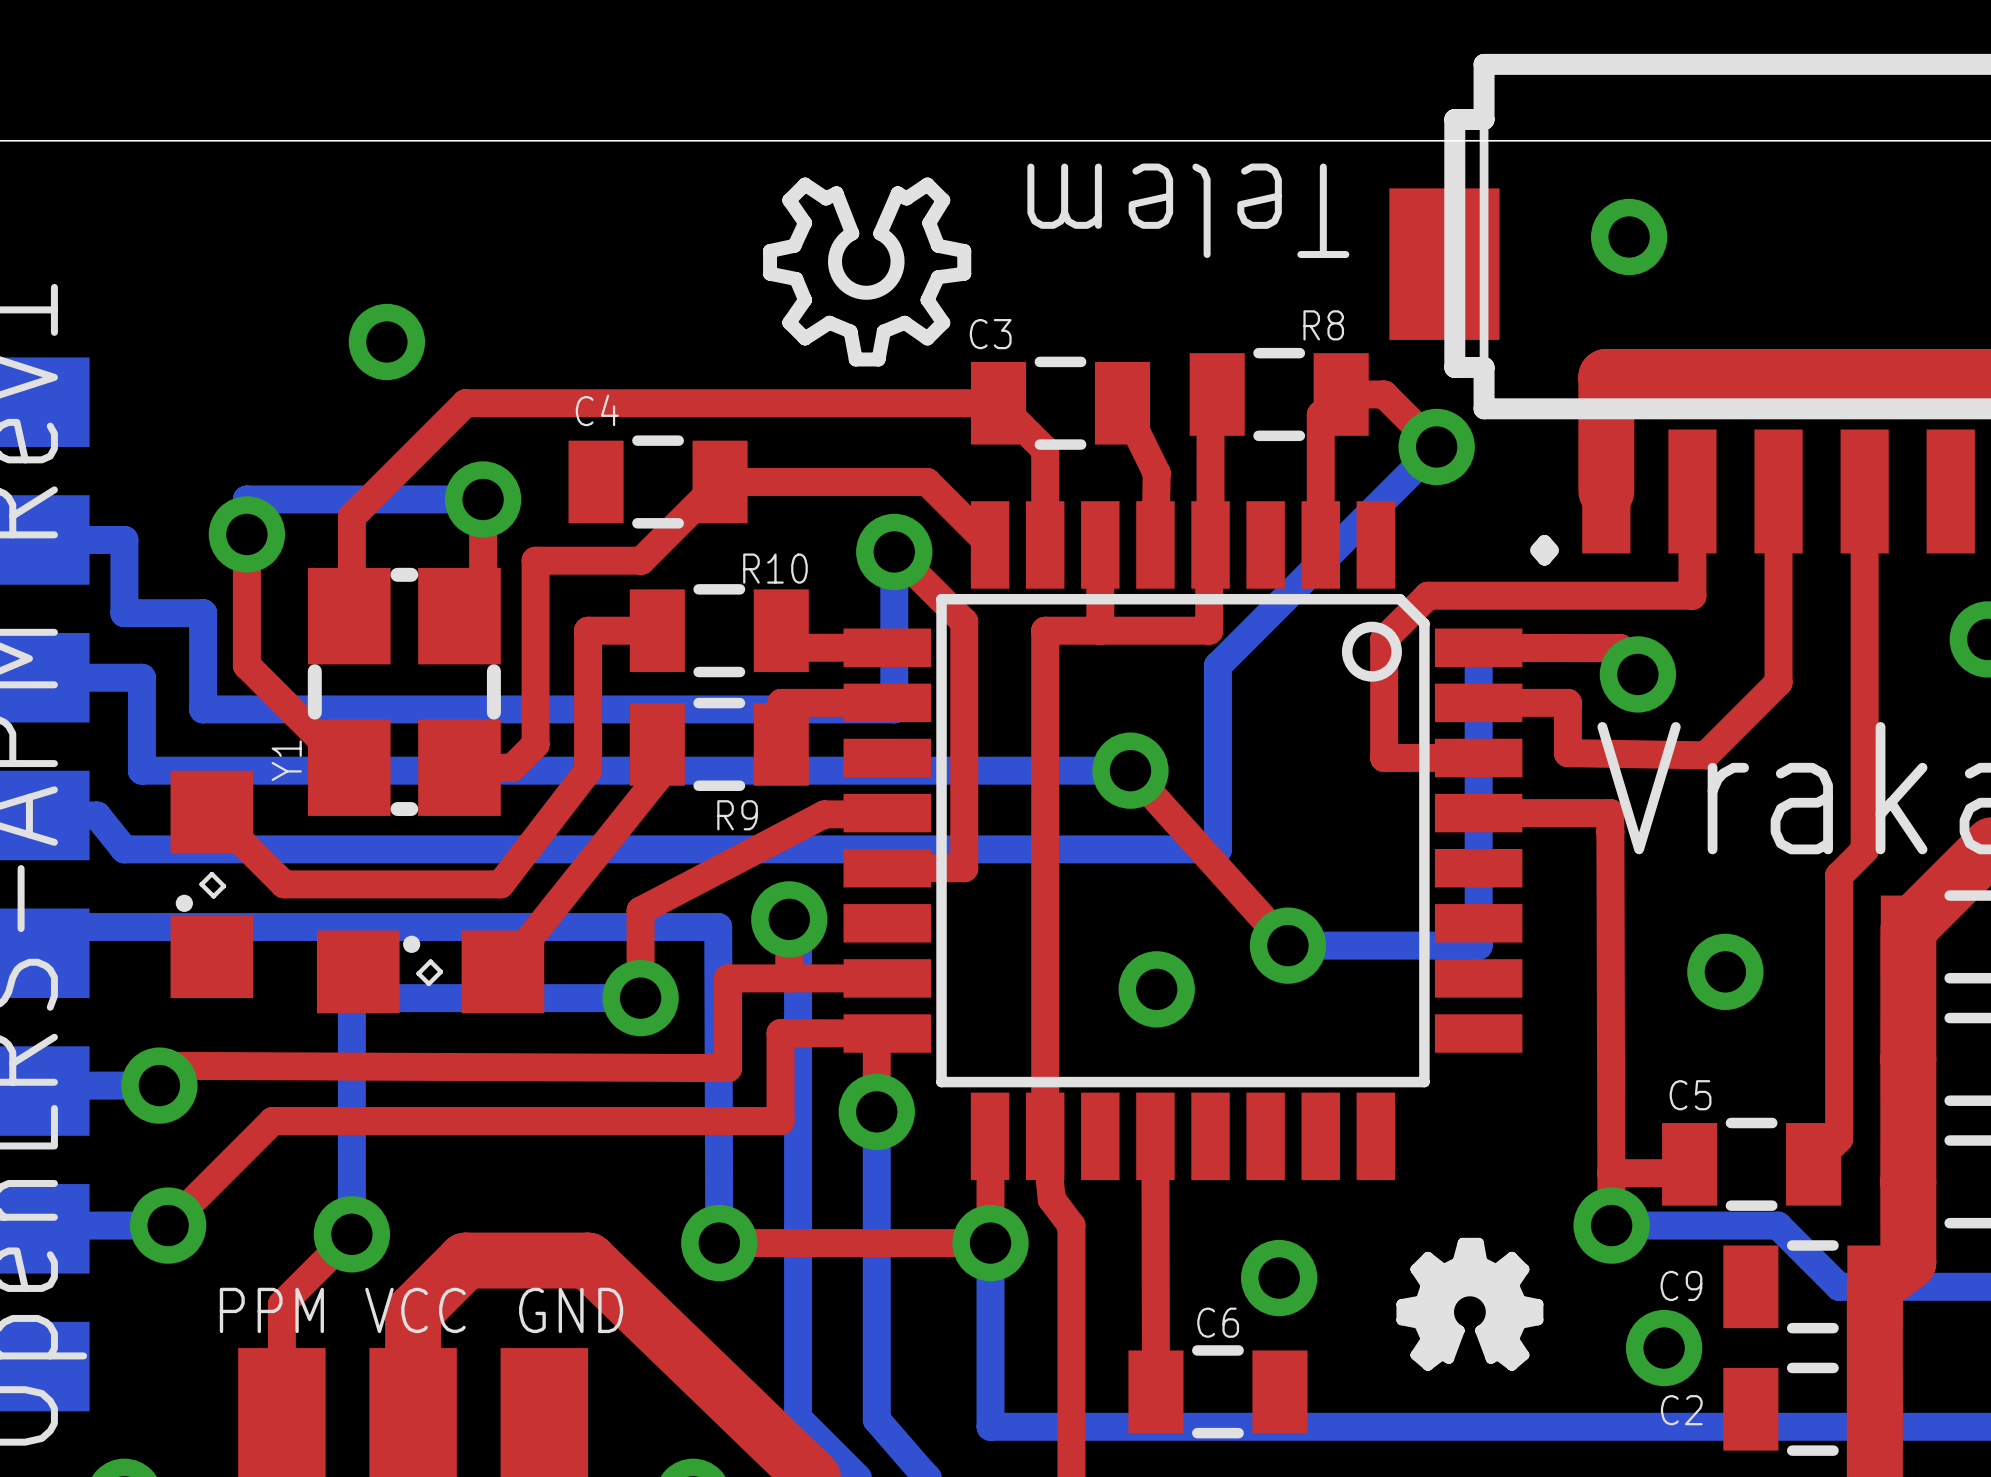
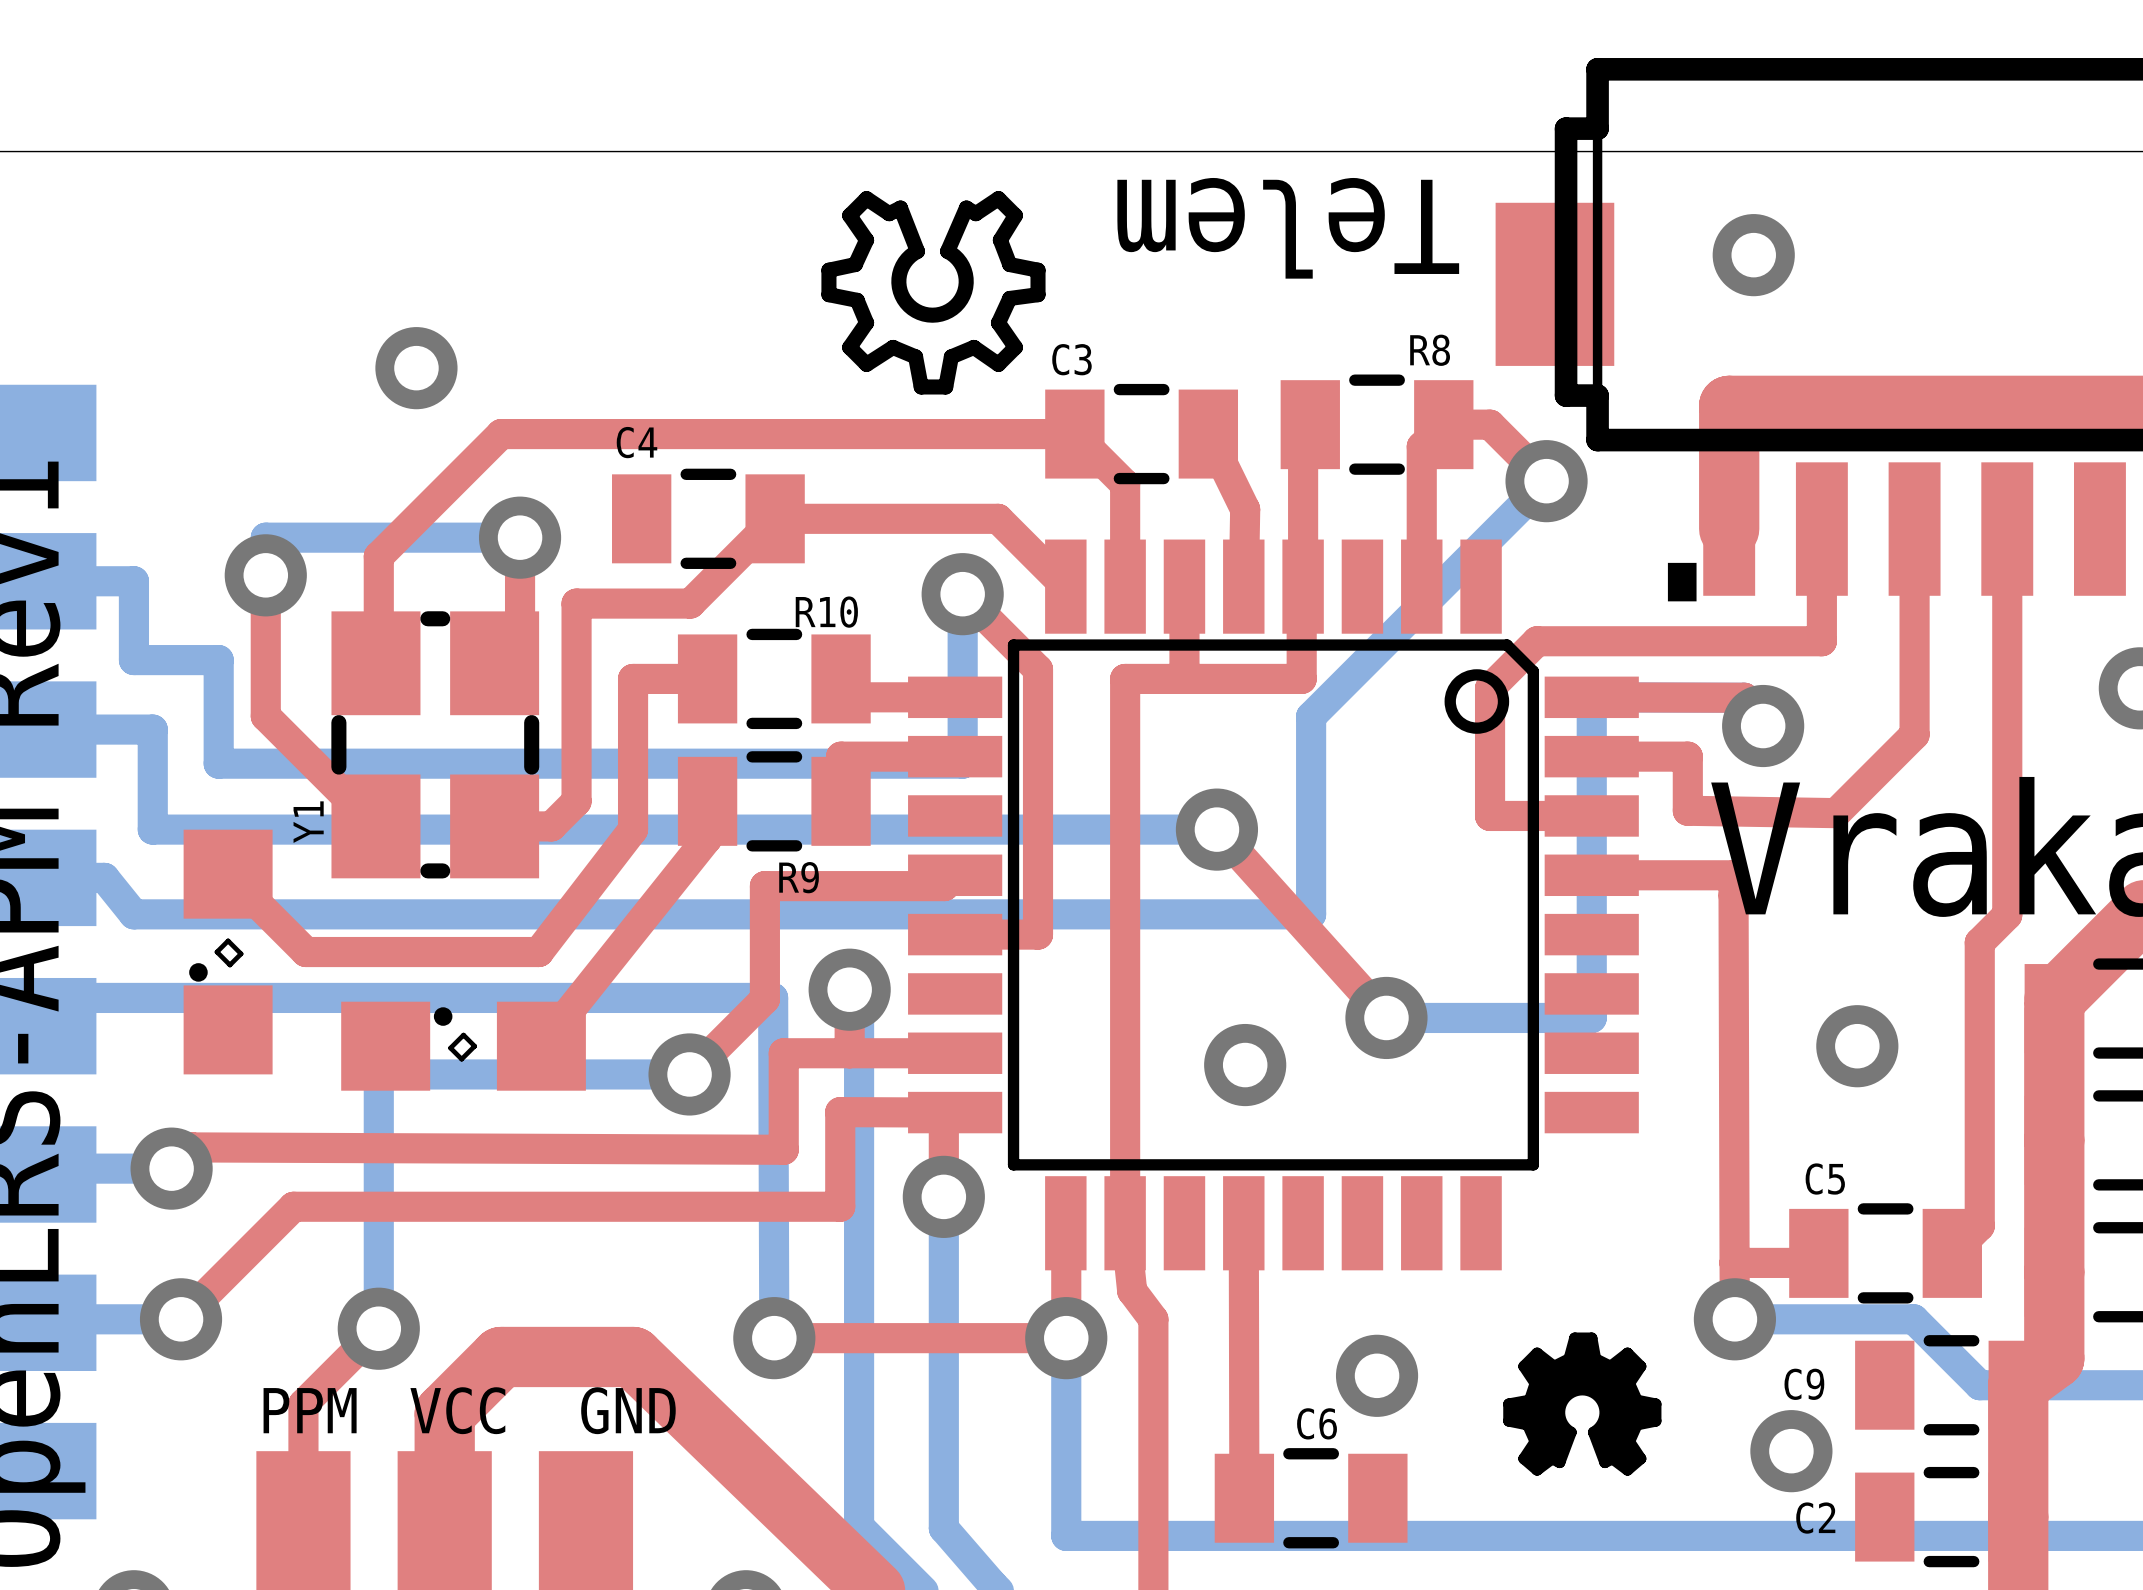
top track: (885, 814) (824, 814) (640, 910) (640, 998) -> (953, 876) (944, 886) (764, 886) (764, 999) (689, 1074)

